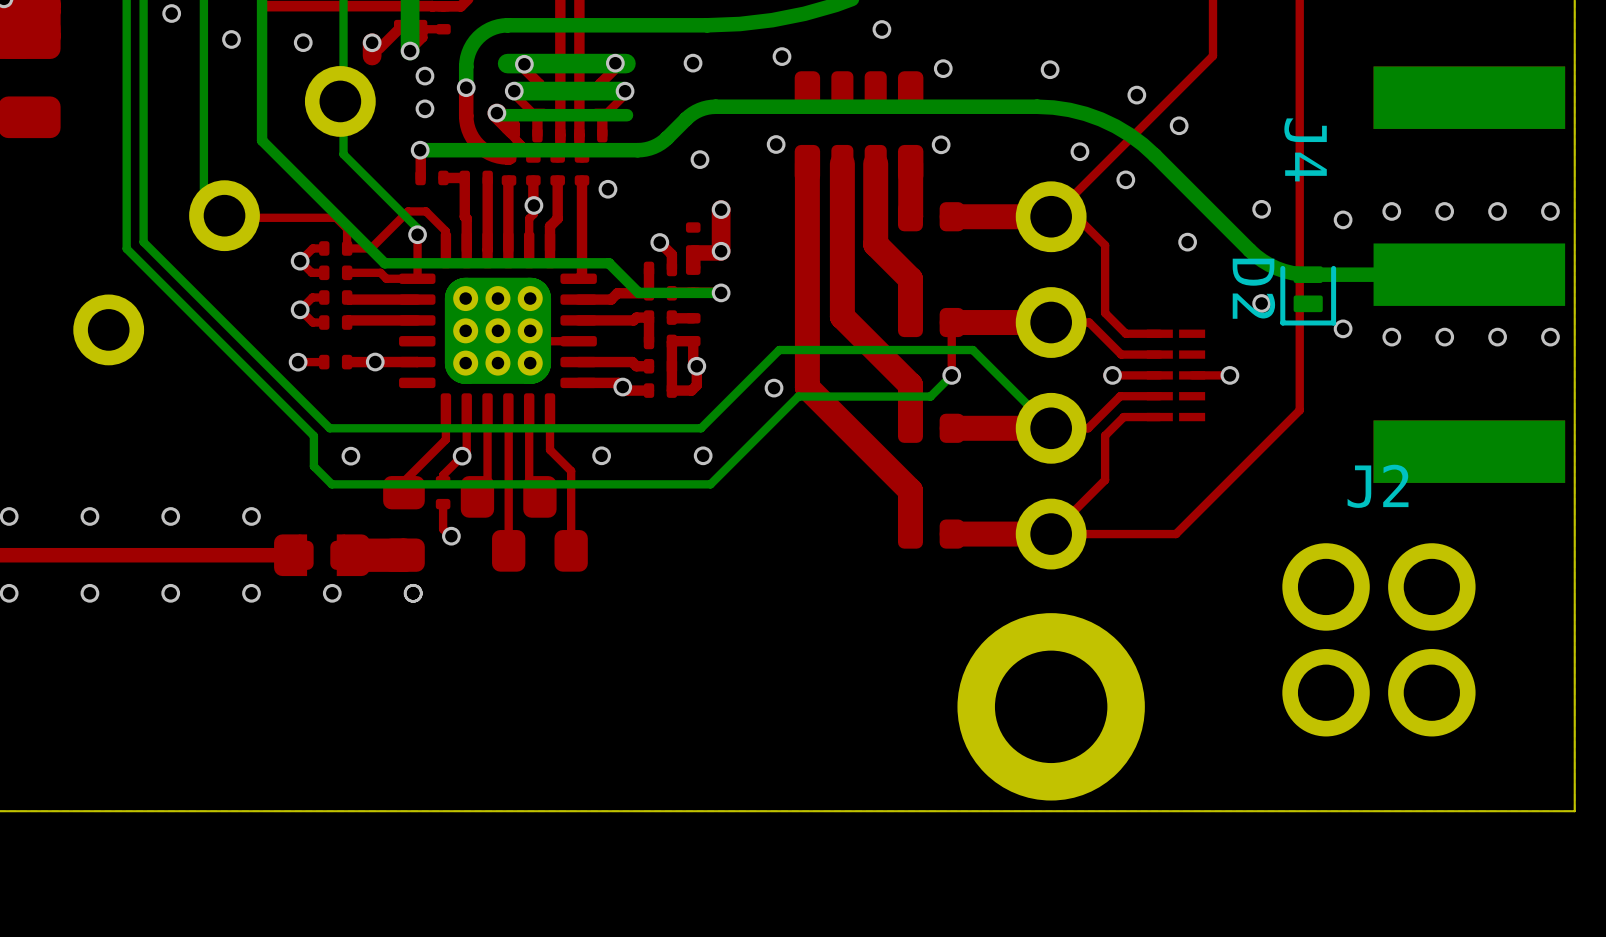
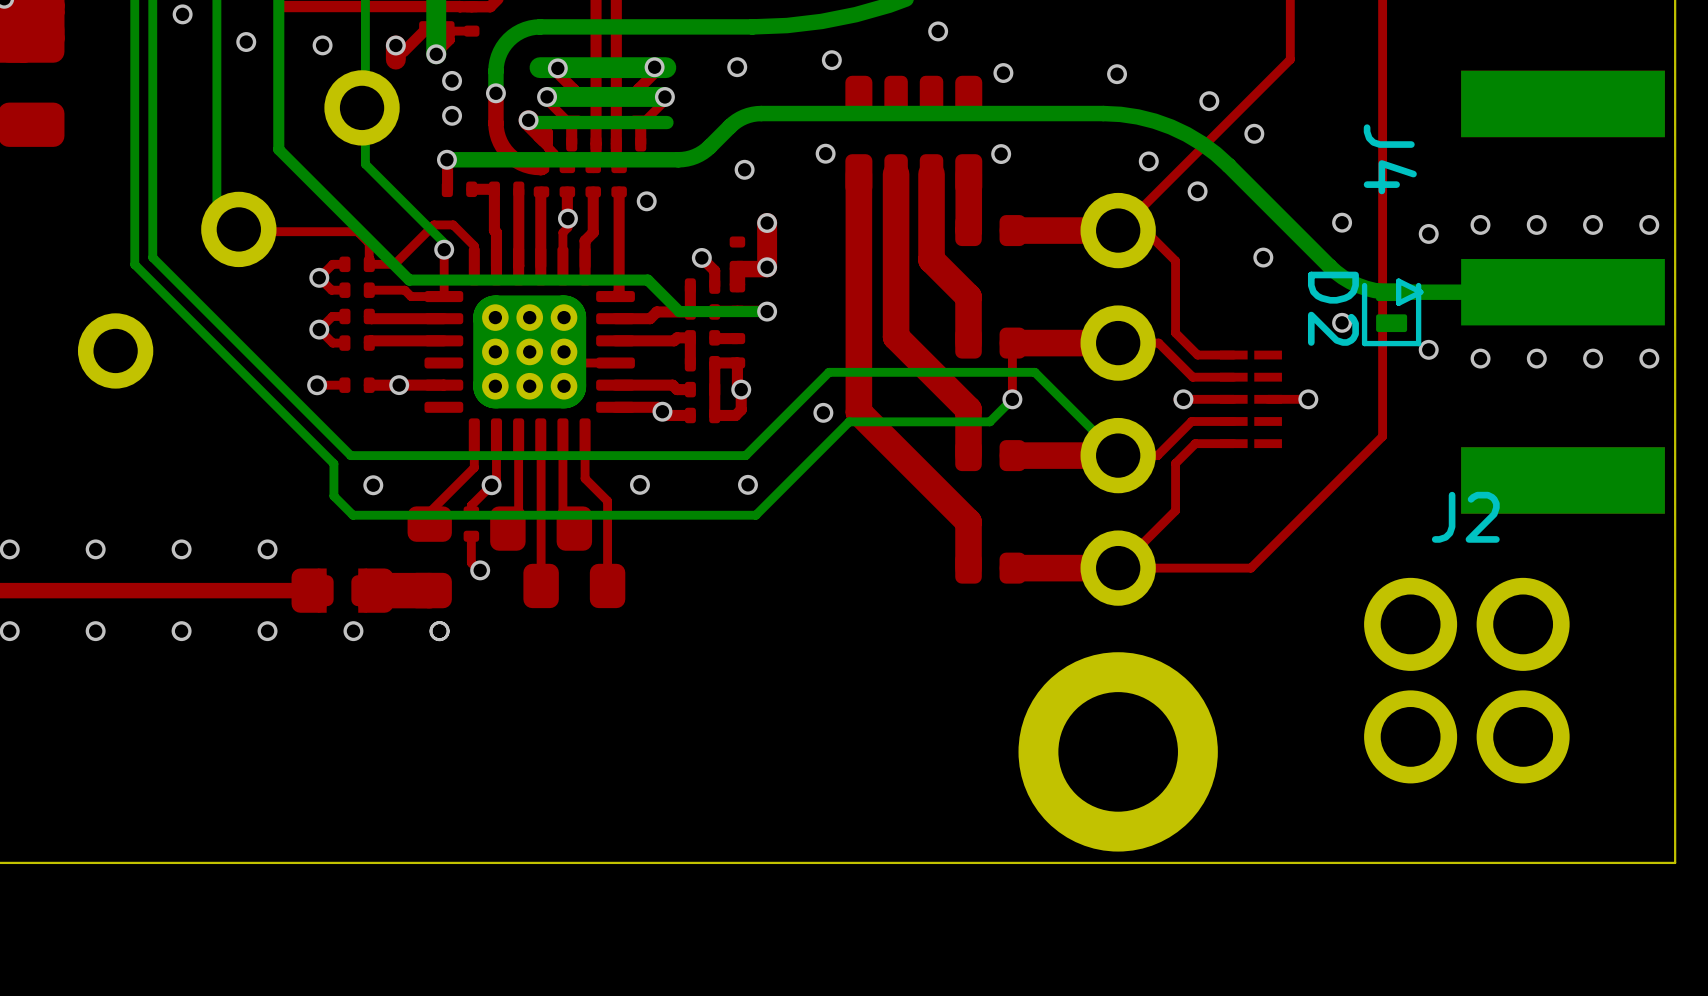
J4 footprint: [1373, 66, 1566, 483] -> [1396, 70, 1665, 514]

